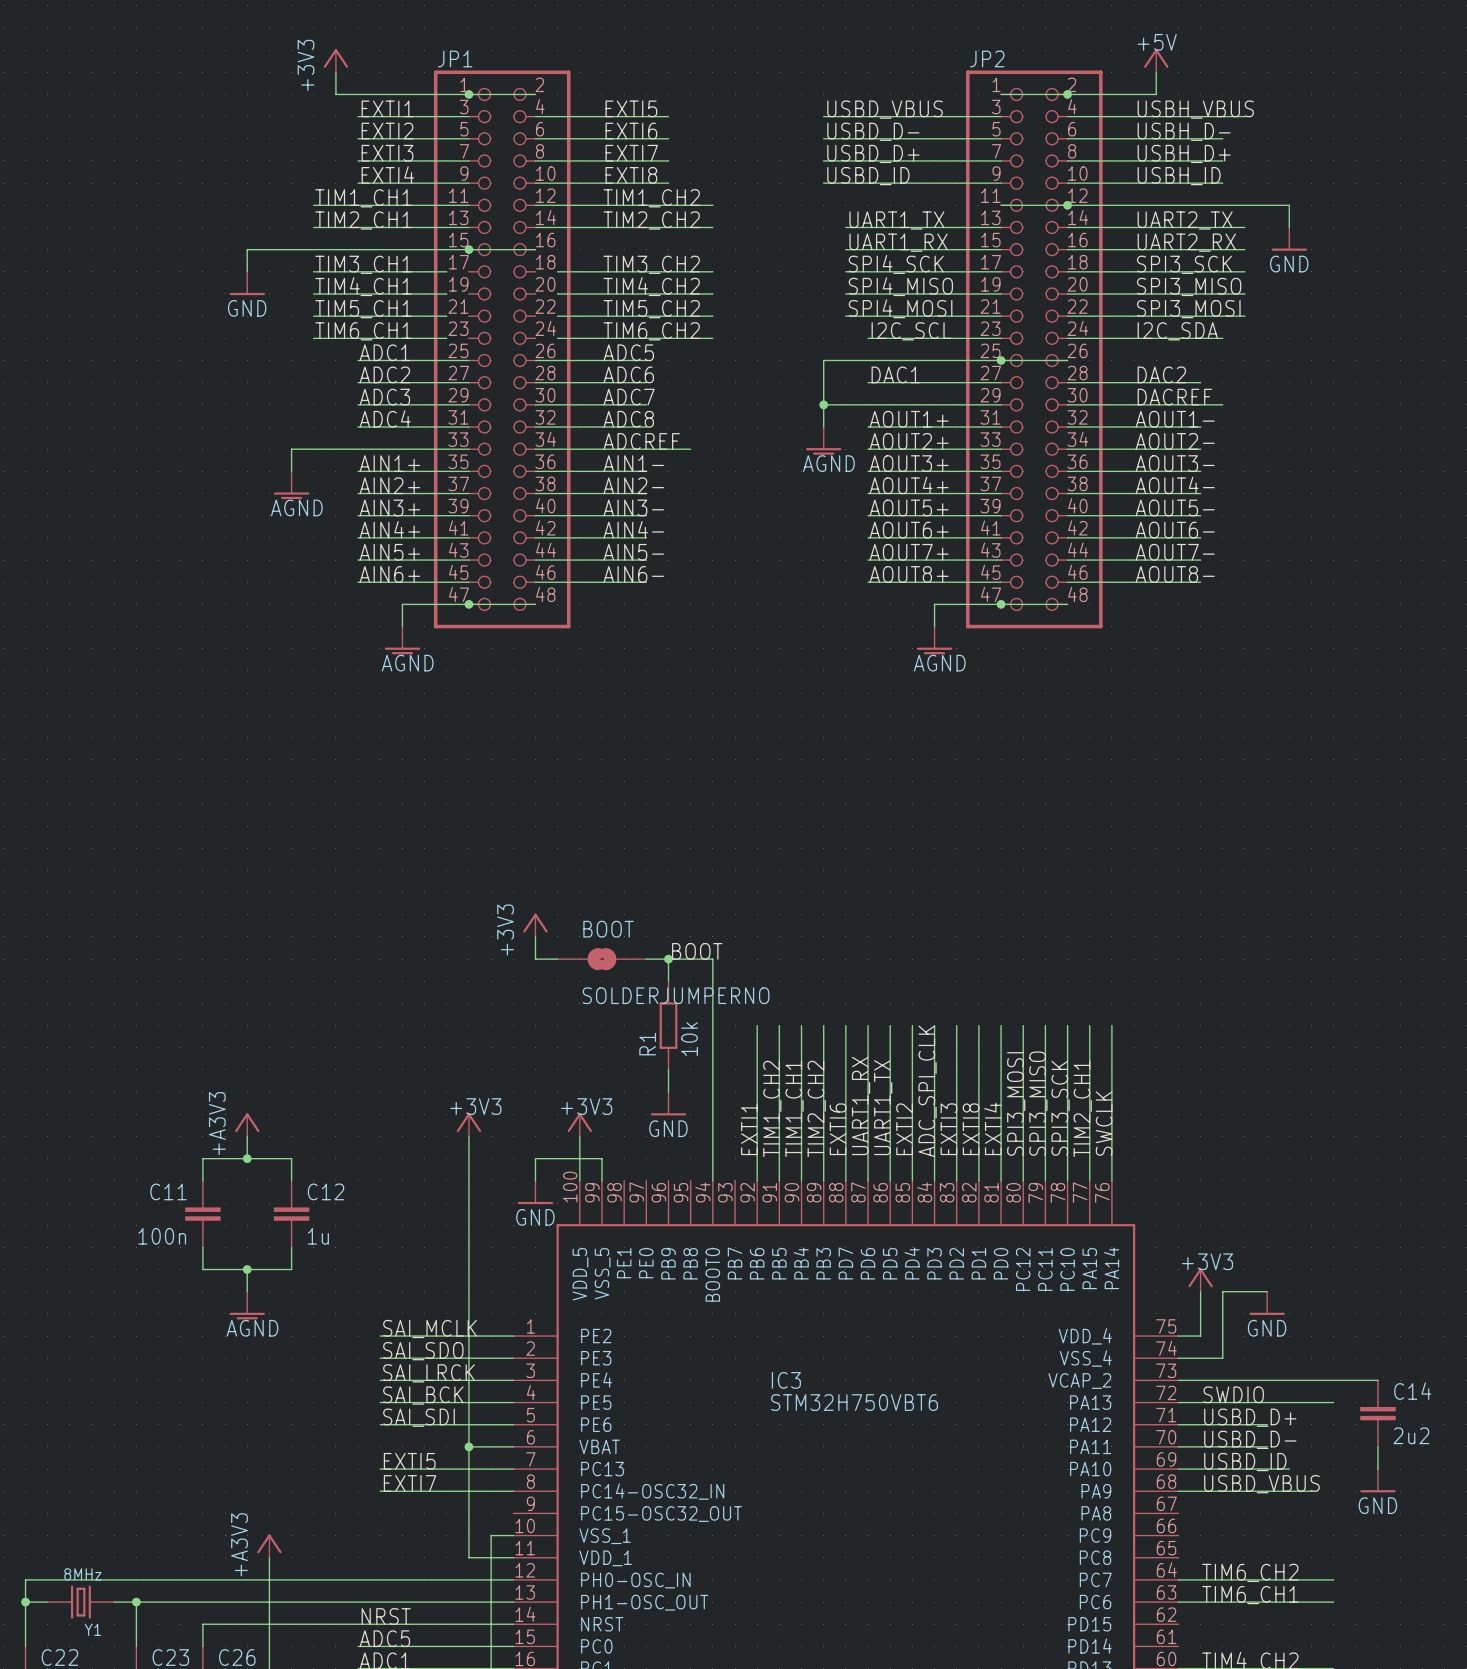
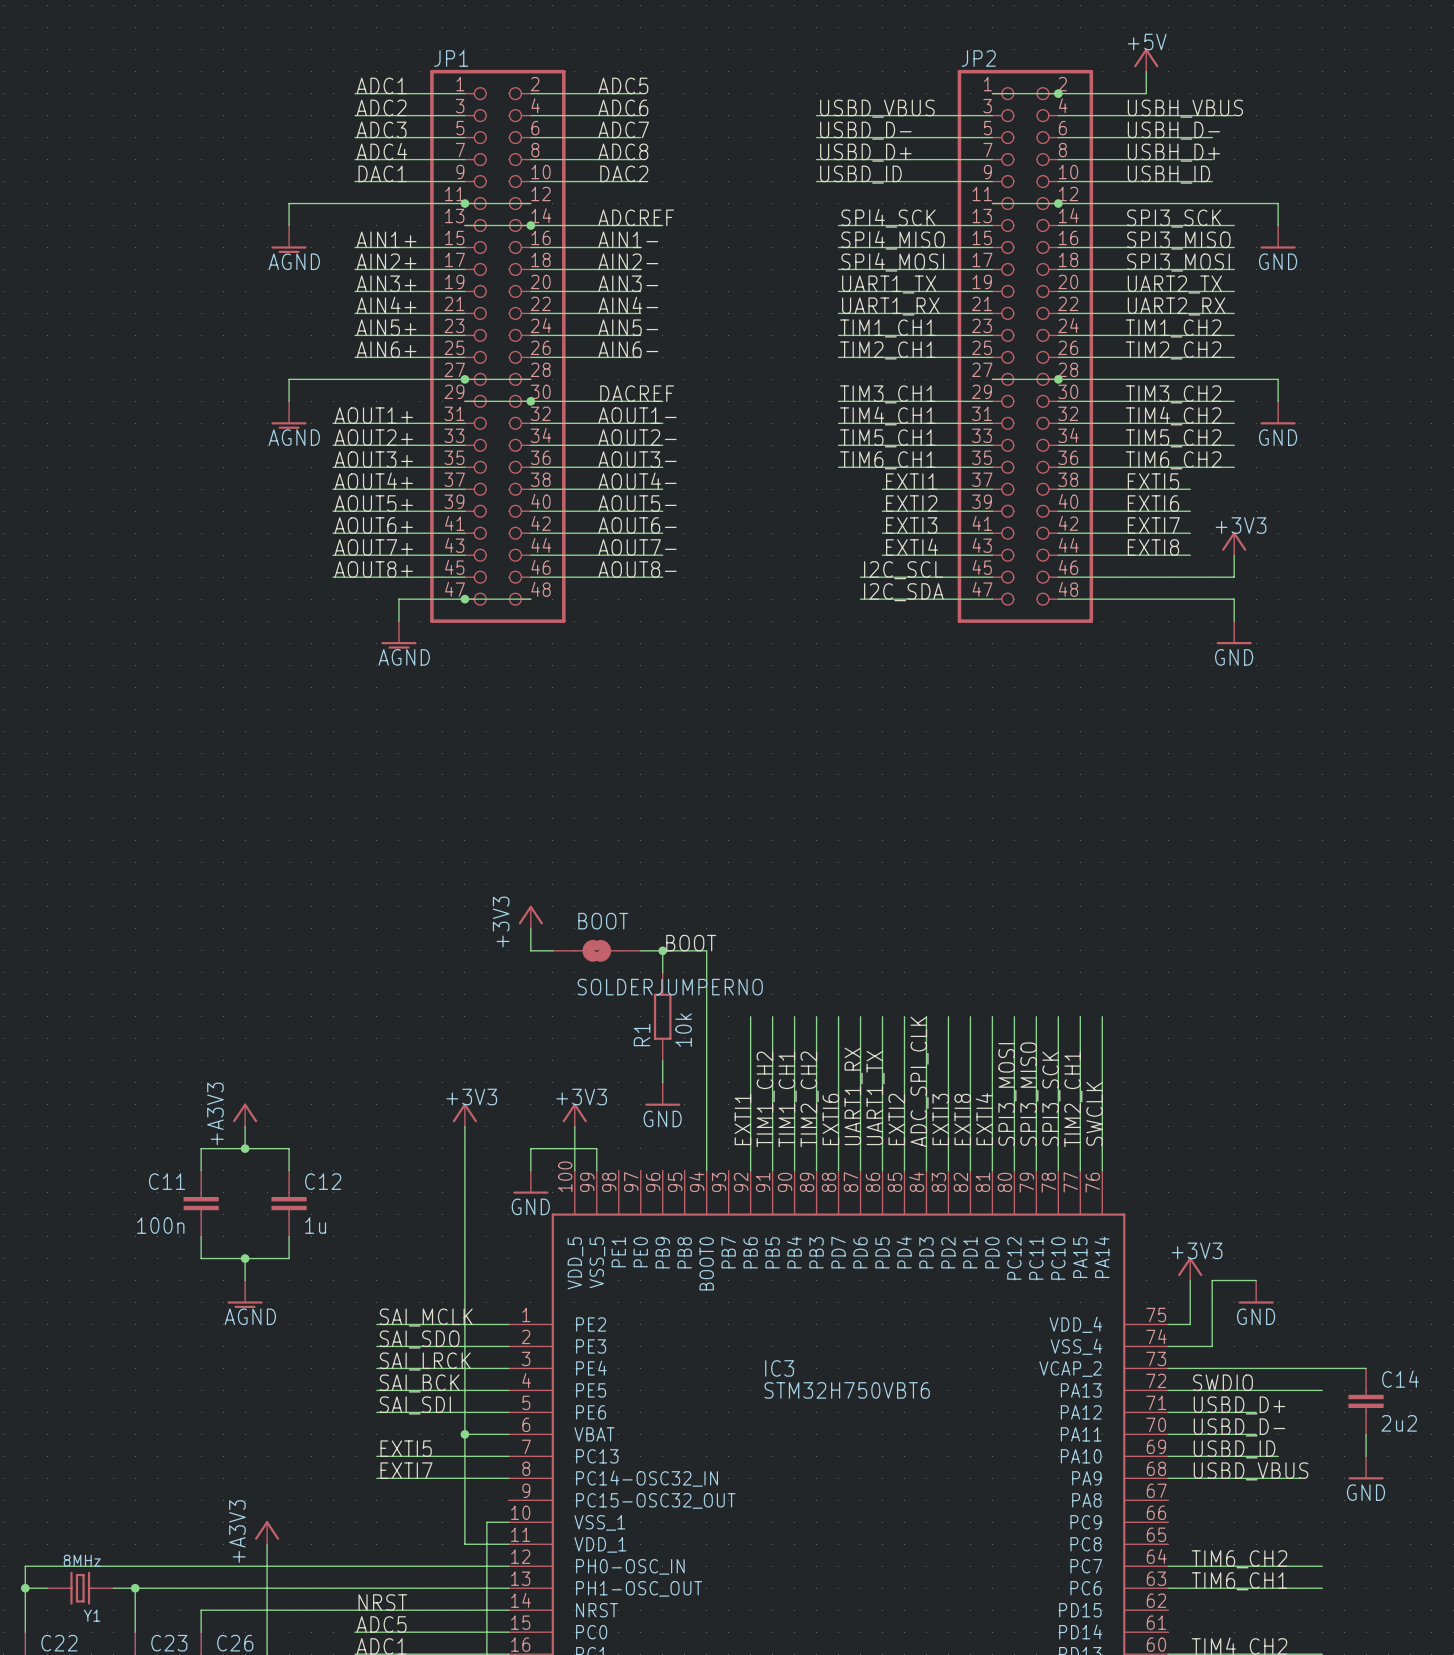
power symbol: +3V3 (335, 60) -> none
wire: (335, 72) (335, 94) (358, 94) -> none
label: none -> ADC1 (381, 85)
label: none -> ADC5 (623, 85)
wire: (468, 94) (535, 94) -> (640, 93) (530, 93)
junction: (468, 94) -> none
label: EXTI1 (387, 108) -> ADC2 (381, 107)
label: EXTI5 (631, 108) -> ADC6 (623, 107)
wire: (646, 116) (668, 116) -> (530, 269) (552, 269)
label: EXTI2 (387, 131) -> ADC3 (381, 129)
label: EXTI6 (631, 131) -> ADC7 (623, 129)
wire: (646, 138) (668, 138) -> (530, 291) (552, 291)
label: EXTI3 (387, 153) -> ADC4 (381, 151)
label: EXTI7 (631, 153) -> ADC8 (623, 151)
wire: (646, 160) (668, 160) -> (530, 313) (552, 313)
label: EXTI4 (387, 175) -> DAC1 (382, 173)
label: EXTI8 (631, 175) -> DAC2 (624, 173)
wire: (646, 183) (668, 183) -> (530, 335) (552, 335)
label: TIM1_CH1 (363, 198) -> none
label: TIM1_CH2 (651, 198) -> none
wire: none -> (311, 203) (289, 203) (289, 225)
junction: none -> (464, 203)
wire: (535, 205) (712, 205) -> (530, 203) (464, 203)
label: TIM2_CH1 (363, 220) -> none
label: TIM2_CH2 (651, 220) -> ADCREF (636, 217)
label: UART1_TX (896, 220) -> SPI4_SCK (888, 218)
label: UART2_TX (1185, 220) -> SPI3_SCK (1174, 218)
wire: (313, 227) (468, 227) -> (530, 225) (464, 225)
junction: none -> (530, 225)
wire: (668, 227) (712, 227) -> none
power symbol: none -> AGND (289, 239)
label: none -> AIN1+ (386, 239)
label: none -> AIN1- (628, 239)
label: UART1_RX (898, 242) -> SPI4_MISO (893, 240)
label: UART2_RX (1186, 242) -> SPI3_MISO (1178, 240)
wire: (358, 249) (247, 249) (247, 271) -> none
wire: (468, 249) (535, 249) -> (640, 247) (530, 247)
junction: (468, 249) -> none
label: TIM3_CH1 (363, 264) -> none
label: none -> AIN2+ (386, 261)
label: TIM3_CH2 (651, 264) -> AIN2- (628, 261)
label: SPI4_SCK (896, 264) -> SPI4_MOSI (892, 262)
label: SPI3_SCK (1184, 264) -> SPI3_MOSI (1178, 262)
wire: (313, 271) (358, 271) -> none
wire: none -> (442, 269) (464, 269)
wire: (646, 271) (712, 271) -> none
power symbol: GND (247, 283) -> none
label: TIM4_CH1 (363, 286) -> none
label: none -> AIN3+ (386, 283)
label: TIM4_CH2 (651, 286) -> AIN3- (628, 283)
label: SPI4_MISO (900, 286) -> UART1_TX (889, 284)
label: SPI3_MISO (1189, 286) -> UART2_TX (1174, 284)
wire: (313, 293) (358, 293) -> none
wire: none -> (442, 291) (464, 291)
wire: (646, 293) (712, 293) -> none
label: none -> AIN4+ (386, 305)
label: SPI4_MOSI (900, 308) -> UART1_RX (890, 306)
label: TIM5_CH1 (363, 309) -> none
label: TIM5_CH2 (651, 309) -> AIN4- (628, 305)
label: SPI3_MOSI (1188, 309) -> UART2_RX (1176, 306)
wire: (313, 316) (358, 316) -> none
wire: none -> (442, 313) (464, 313)
wire: (646, 316) (712, 316) -> none
label: none -> AIN5+ (386, 327)
label: TIM6_CH1 (363, 331) -> none
label: TIM6_CH2 (651, 331) -> AIN5- (628, 327)
label: none -> TIM1_CH1 (887, 328)
label: I2C_SCL (911, 331) -> none
label: I2C_SDA (1177, 331) -> TIM1_CH2 (1173, 328)
wire: (313, 338) (358, 338) -> none
wire: none -> (442, 335) (464, 335)
wire: (646, 338) (712, 338) -> none
wire: none -> (838, 335) (860, 335)
wire: none -> (1212, 335) (1234, 335)
label: ADC1 (384, 352) -> AIN6+ (386, 349)
label: ADC5 (628, 352) -> AIN6- (628, 349)
label: none -> TIM2_CH1 (887, 350)
label: none -> TIM2_CH2 (1173, 350)
wire: (845, 360) (823, 360) (823, 427) -> none
wire: (1001, 360) (1067, 360) -> (1234, 357) (1058, 357)
junction: (1001, 360) -> none
label: ADC2 (384, 374) -> none
label: ADC6 (628, 374) -> none
label: DAC1 (895, 374) -> none
label: DAC2 (1161, 374) -> none
wire: none -> (355, 379) (289, 379) (289, 401)
junction: none -> (464, 379)
wire: (535, 382) (646, 382) -> (530, 379) (464, 379)
wire: (868, 382) (1001, 382) -> (1058, 379) (992, 379)
junction: none -> (1058, 379)
wire: none -> (1190, 379) (1278, 379) (1278, 401)
label: ADC3 (384, 397) -> none
label: ADC7 (629, 397) -> DACREF (637, 393)
label: none -> TIM3_CH1 (887, 394)
label: DACREF (1174, 397) -> TIM3_CH2 (1173, 394)
wire: (358, 404) (468, 404) -> (530, 401) (464, 401)
junction: none -> (530, 401)
wire: (823, 404) (845, 404) -> (640, 467) (662, 467)
junction: (823, 404) -> none
wire: none -> (1212, 401) (1234, 401)
power symbol: none -> GND (1278, 412)
label: ADC4 (385, 418) -> none
label: none -> AOUT1+ (373, 415)
label: ADC8 (628, 419) -> AOUT1- (637, 415)
label: none -> TIM4_CH1 (887, 416)
label: AOUT1+ (909, 419) -> none
label: AOUT1- (1175, 419) -> TIM4_CH2 (1173, 416)
wire: none -> (333, 423) (355, 423)
wire: none -> (640, 423) (662, 423)
wire: none -> (1190, 423) (1234, 423)
power symbol: AGND (823, 440) -> none
label: none -> AOUT2+ (373, 437)
label: ADCREF (641, 441) -> AOUT2- (637, 437)
label: AOUT2+ (909, 441) -> none
label: AOUT2- (1175, 441) -> TIM5_CH2 (1173, 438)
label: none -> TIM5_CH1 (887, 438)
wire: (335, 449) (291, 449) (291, 471) -> none
wire: (668, 449) (690, 449) -> (640, 401) (662, 401)
wire: none -> (1190, 445) (1234, 445)
label: none -> AOUT3+ (373, 459)
label: AIN1+ (389, 463) -> none
label: AIN1- (633, 463) -> AOUT3- (637, 459)
label: AOUT3+ (909, 463) -> none
label: AOUT3- (1175, 463) -> TIM6_CH2 (1173, 460)
label: none -> TIM6_CH1 (887, 460)
wire: none -> (333, 467) (355, 467)
wire: none -> (1190, 467) (1234, 467)
power symbol position: AGND (291, 485) -> AGND (289, 415)
label: none -> AOUT4+ (373, 481)
label: AIN2+ (389, 485) -> none
label: AIN2- (633, 485) -> AOUT4- (637, 481)
label: AOUT4+ (909, 485) -> none
label: none -> EXTI1 (911, 481)
label: AOUT4- (1175, 485) -> EXTI5 (1153, 481)
wire: none -> (333, 489) (355, 489)
wire: none -> (640, 489) (662, 489)
wire: (868, 493) (890, 493) -> (838, 445) (860, 445)
label: none -> AOUT5+ (373, 503)
label: AIN3+ (389, 507) -> none
label: AIN3- (633, 507) -> AOUT5- (637, 503)
label: AOUT5+ (909, 507) -> none
label: none -> EXTI2 (911, 503)
label: AOUT5- (1175, 507) -> EXTI6 (1153, 503)
wire: none -> (333, 511) (355, 511)
wire: none -> (640, 511) (662, 511)
wire: (868, 515) (890, 515) -> (838, 467) (860, 467)
label: AIN4+ (389, 529) -> none
label: AIN4- (633, 529) -> AOUT6- (637, 525)
label: none -> AOUT6+ (373, 525)
label: AOUT6+ (909, 530) -> none
label: none -> EXTI3 (911, 525)
label: AOUT6- (1175, 530) -> EXTI7 (1153, 525)
wire: none -> (333, 533) (355, 533)
wire: none -> (640, 533) (662, 533)
wire: (868, 537) (890, 537) -> (838, 423) (860, 423)
power symbol: none -> +3V3 (1234, 543)
label: none -> EXTI4 (912, 547)
label: none -> AOUT7+ (373, 547)
label: AIN5+ (389, 552) -> none
label: AIN5- (633, 552) -> AOUT7- (637, 547)
label: AOUT7+ (909, 552) -> none
label: AOUT7- (1175, 552) -> EXTI8 (1153, 547)
wire: none -> (333, 555) (355, 555)
wire: none -> (640, 555) (662, 555)
wire: (868, 560) (890, 560) -> none
wire: none -> (1234, 555) (1234, 577) (1190, 577)
label: none -> AOUT8+ (373, 569)
label: AIN6+ (389, 574) -> none
label: AIN6- (633, 574) -> AOUT8- (637, 569)
label: AOUT8+ (909, 574) -> I2C_SCL (903, 570)
label: AOUT8- (1175, 574) -> none
wire: none -> (333, 577) (355, 577)
wire: none -> (640, 577) (662, 577)
label: none -> I2C_SDA (903, 592)
wire: (934, 604) (934, 626) -> (926, 599) (860, 599)
wire: (1001, 604) (1067, 604) -> (1234, 621) (1234, 599) (1058, 599)
junction: (1001, 604) -> none
power symbol: none -> GND (1234, 632)
power symbol: AGND (934, 640) -> none

